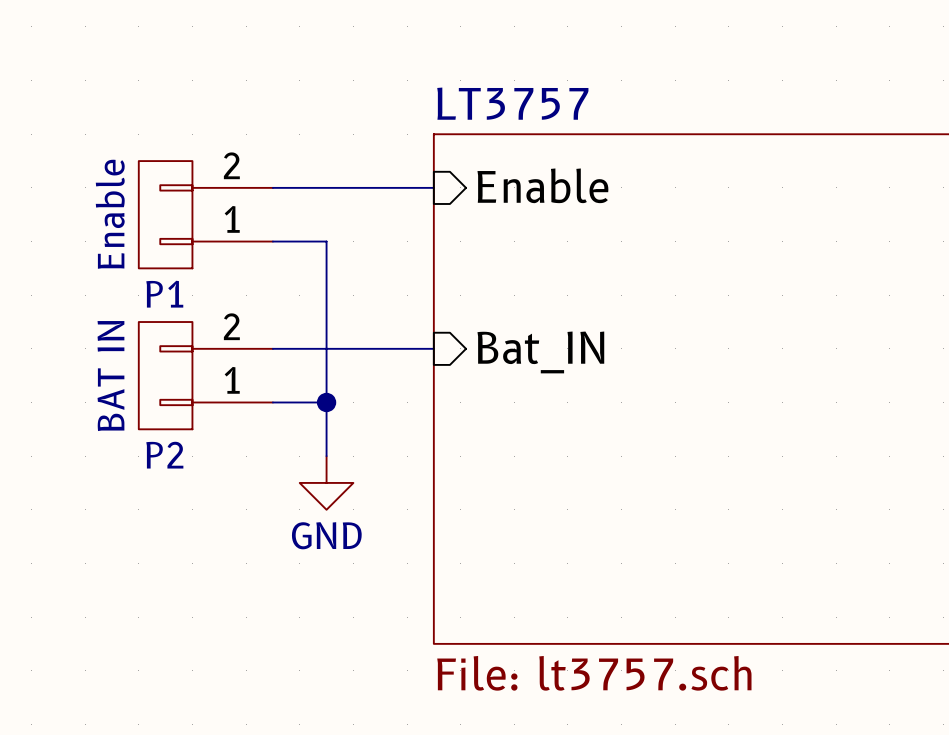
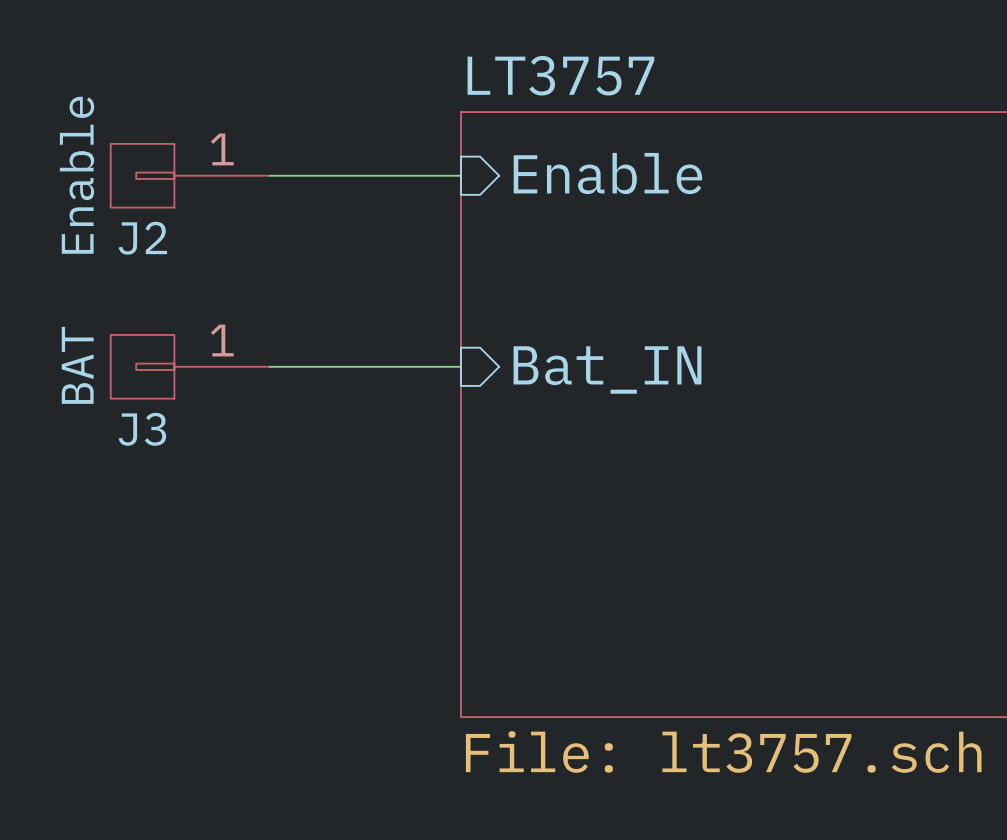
J2: none -> Enable (190, 175)
P1: Enable (205, 214) -> none
wire: (272, 241) (326, 241) (326, 456) -> none
J3: none -> BAT (190, 366)
P2: BAT IN (205, 375) -> none
wire: (272, 402) (326, 402) -> none
junction: (326, 402) -> none
power symbol: GND (326, 482) -> none

